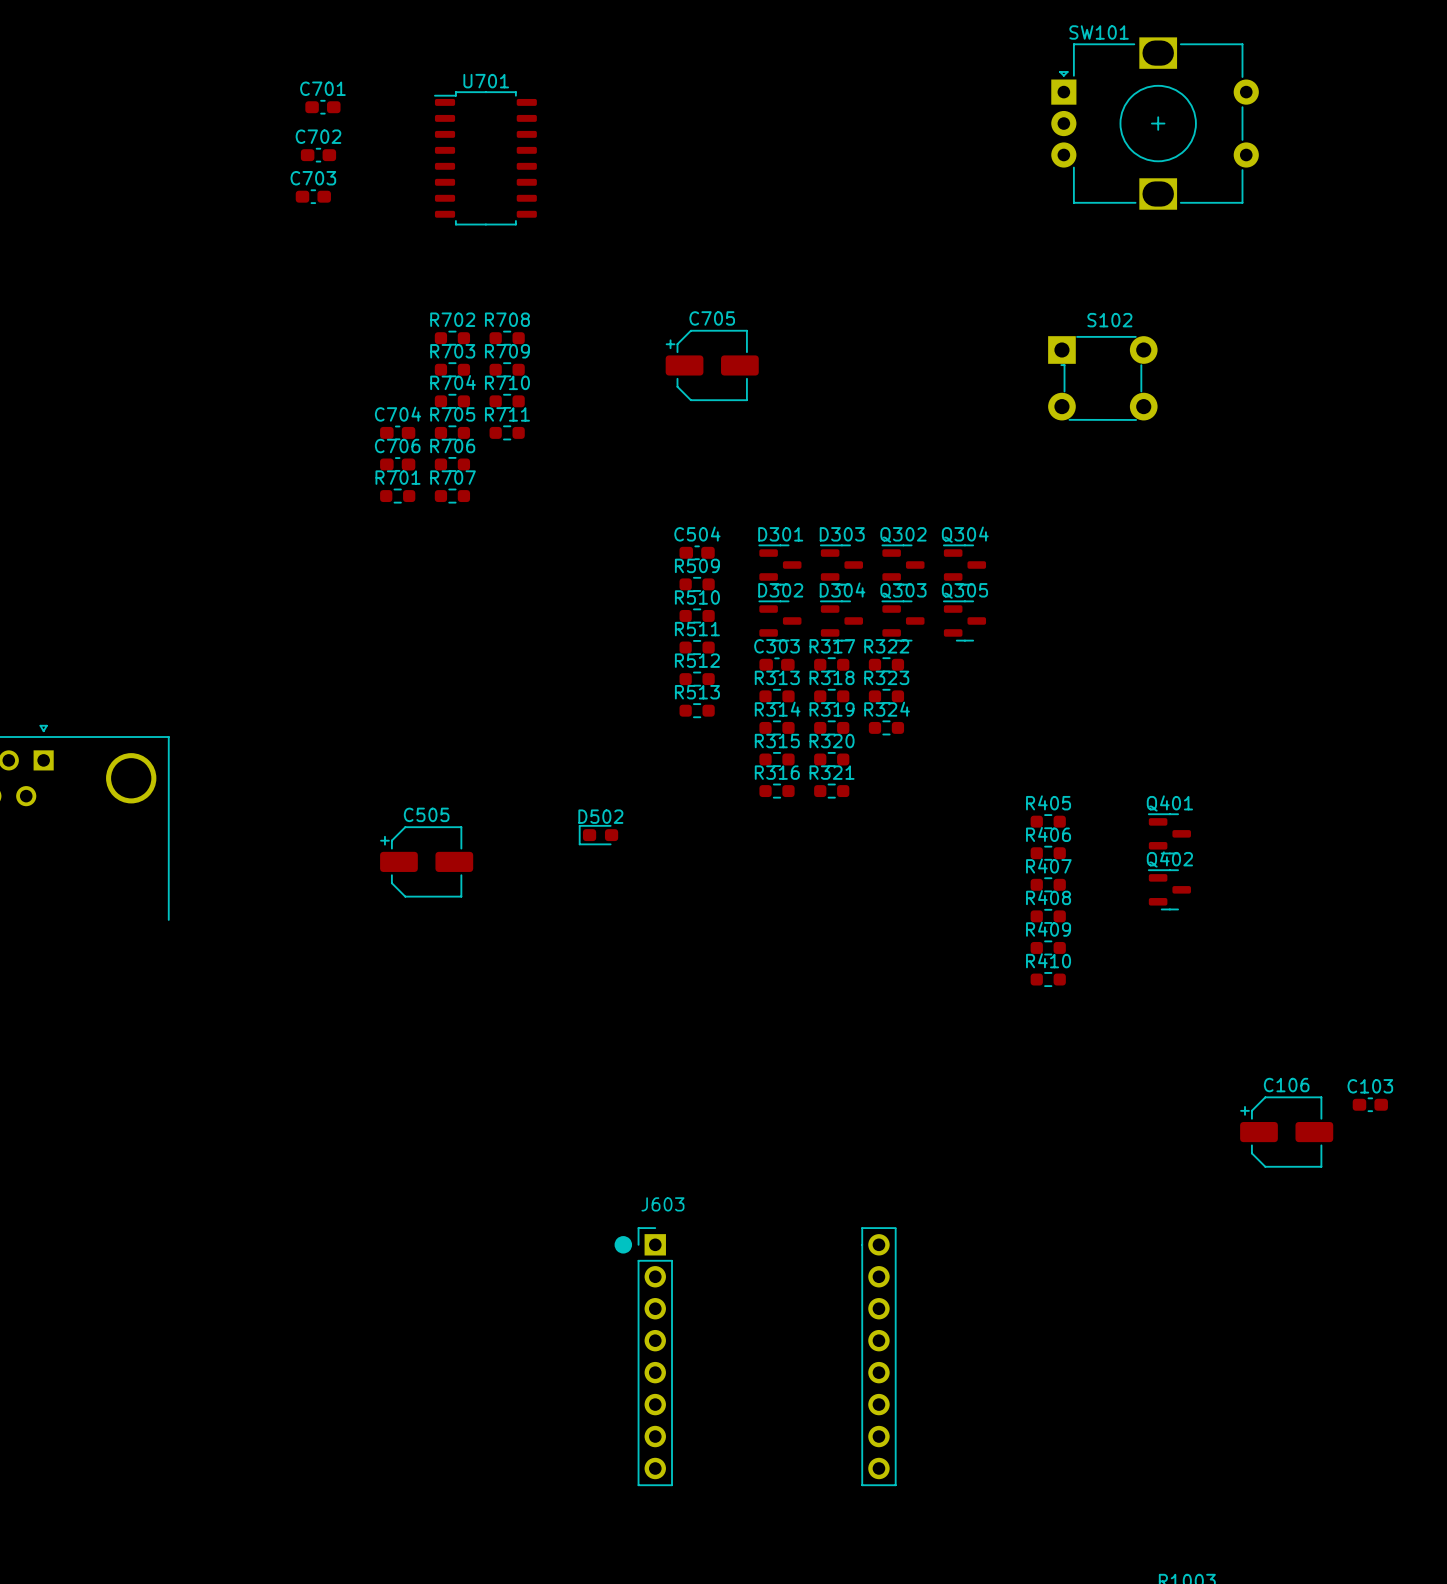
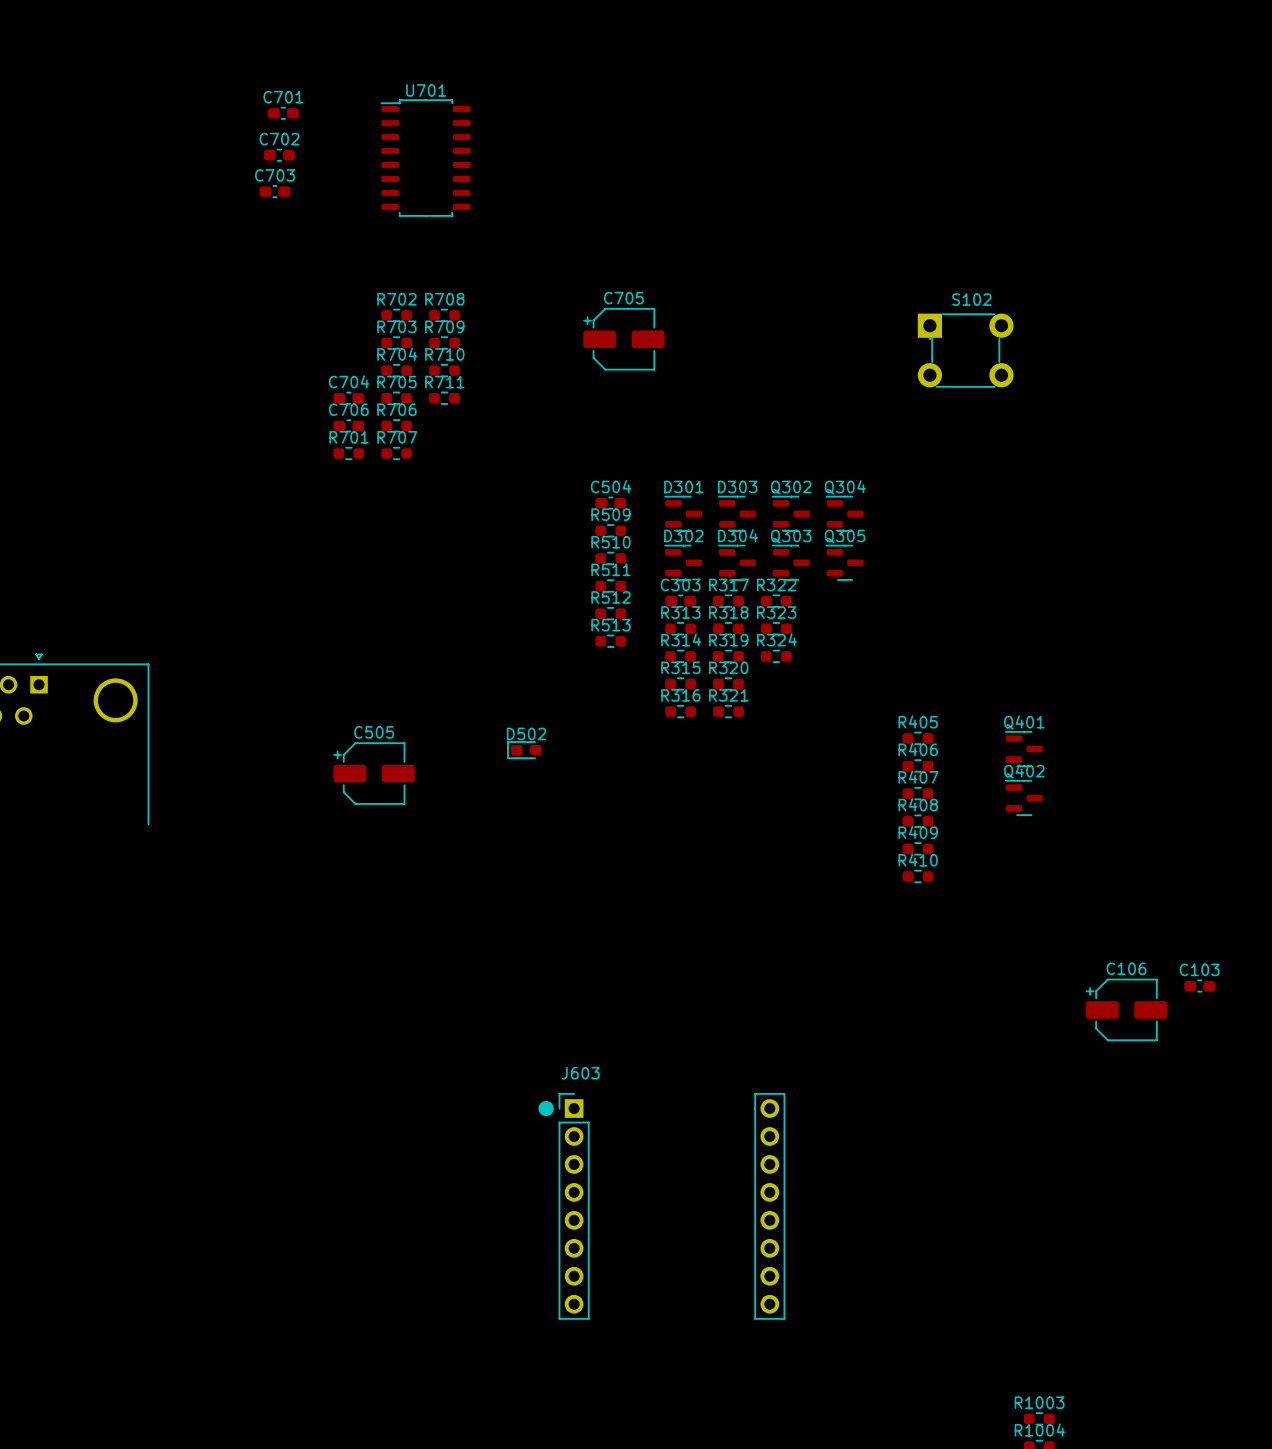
SW101: (1155, 123) -> none

